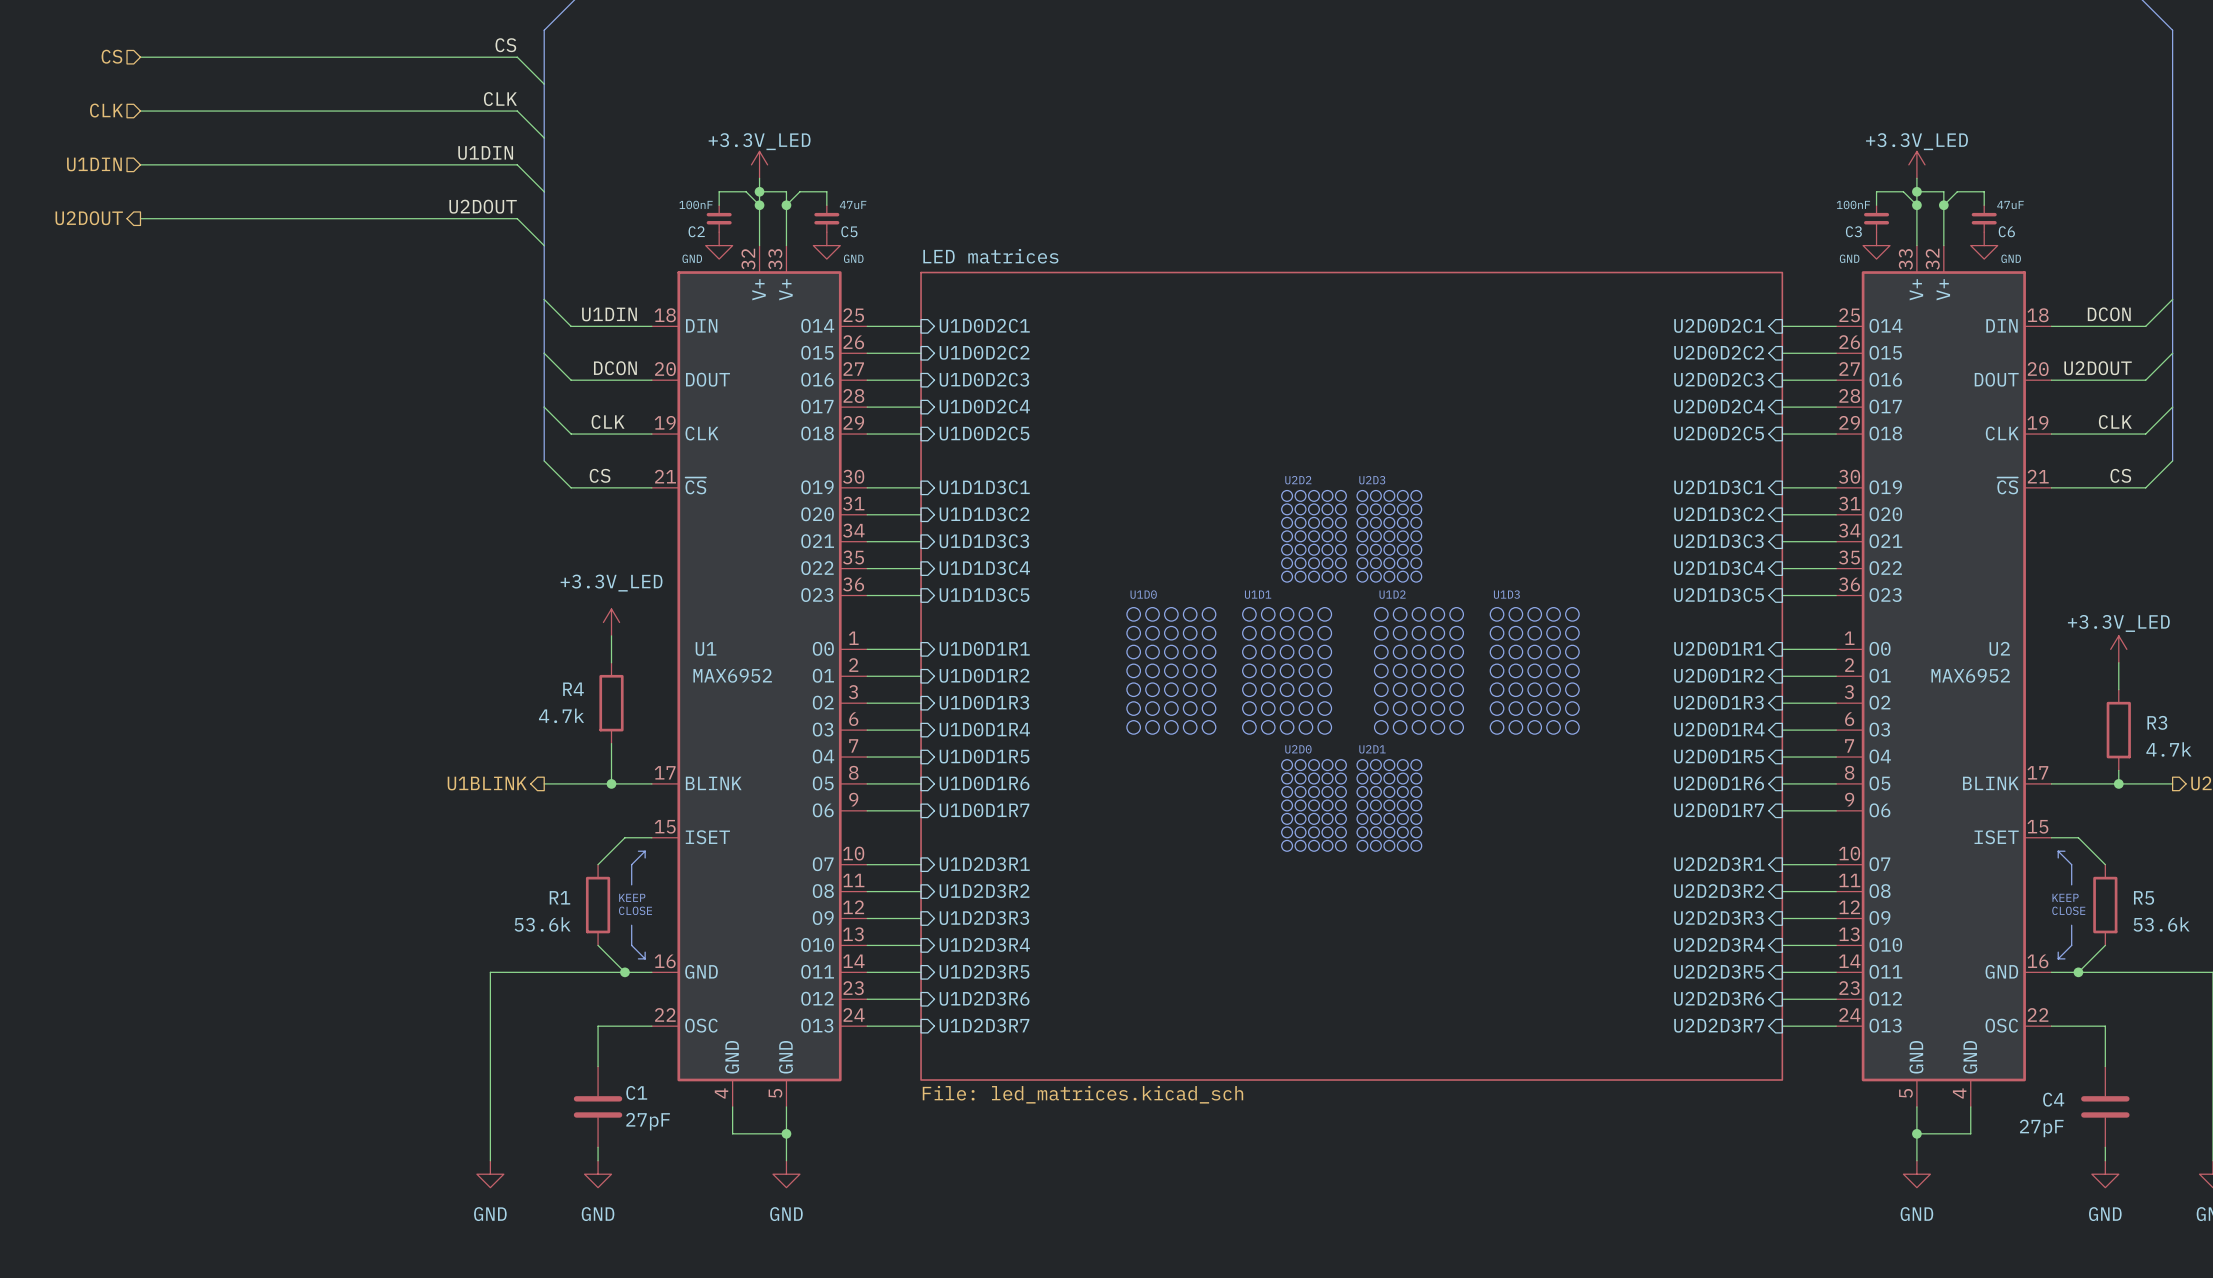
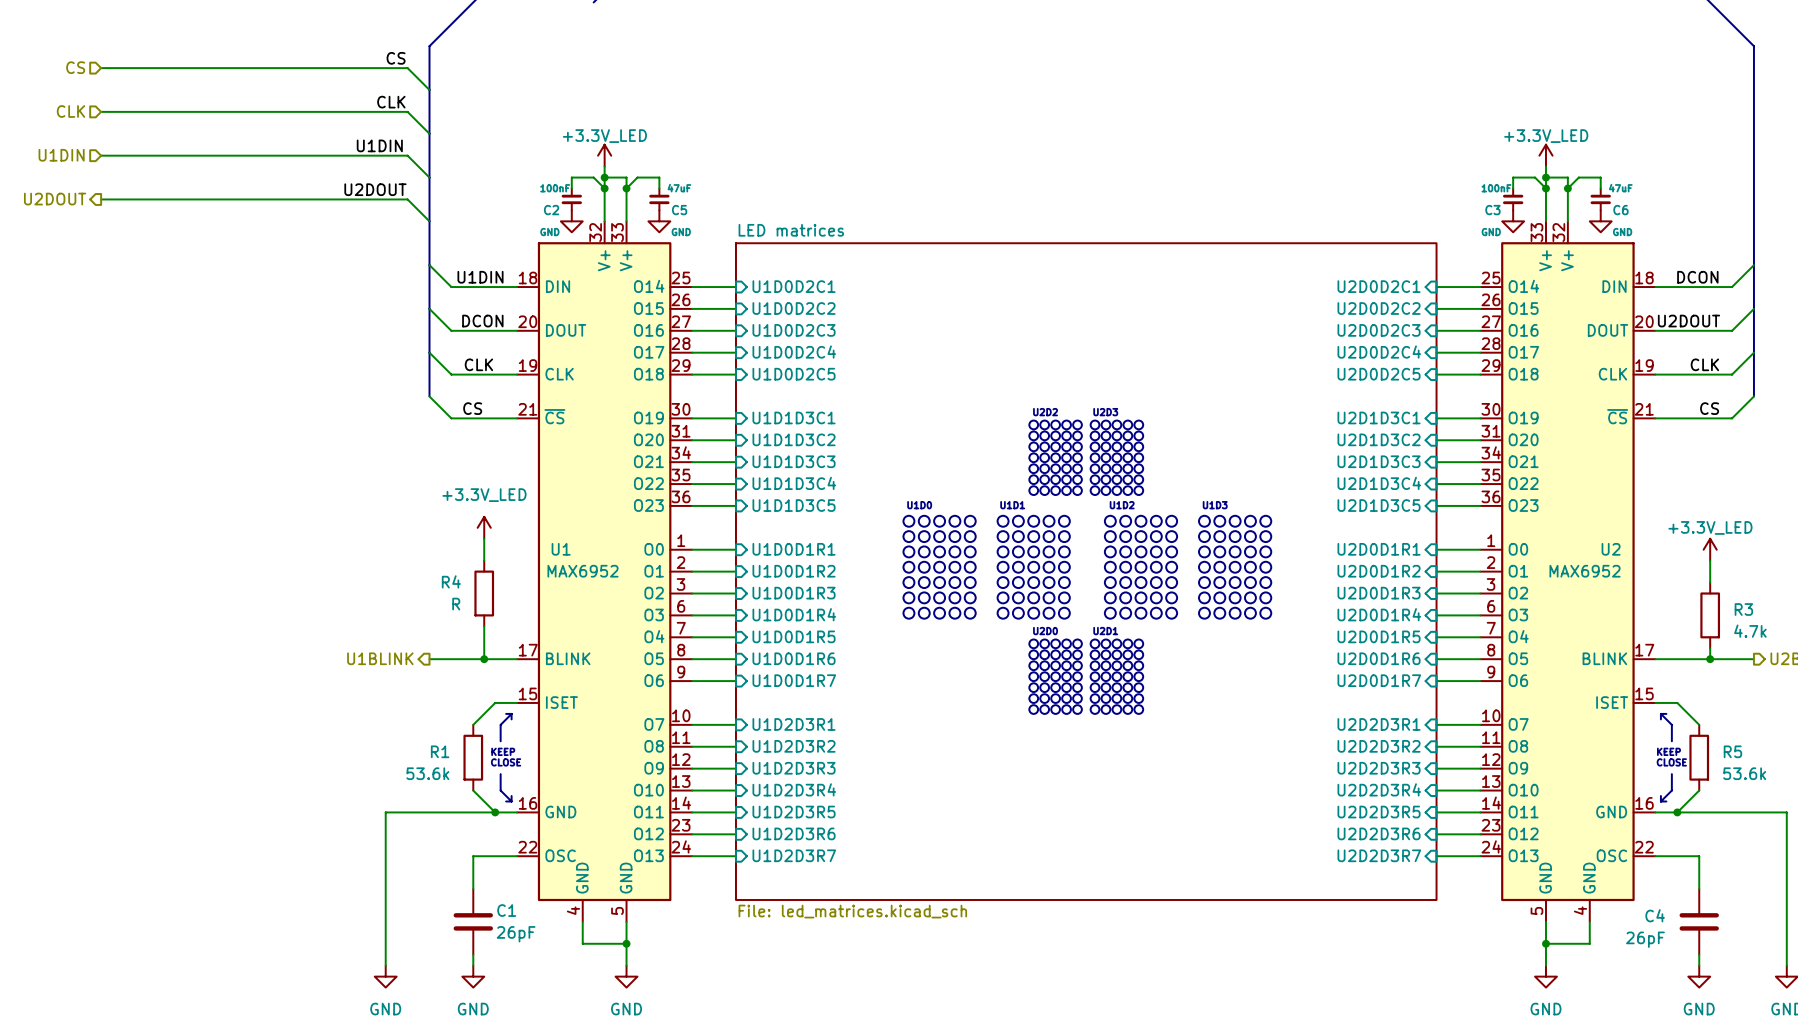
R4 value: 4.7k (561, 715) -> R (456, 604)
C1 value: 27pF (648, 1121) -> 26pF (516, 934)
C4 value: 27pF (2041, 1128) -> 26pF (1645, 939)

